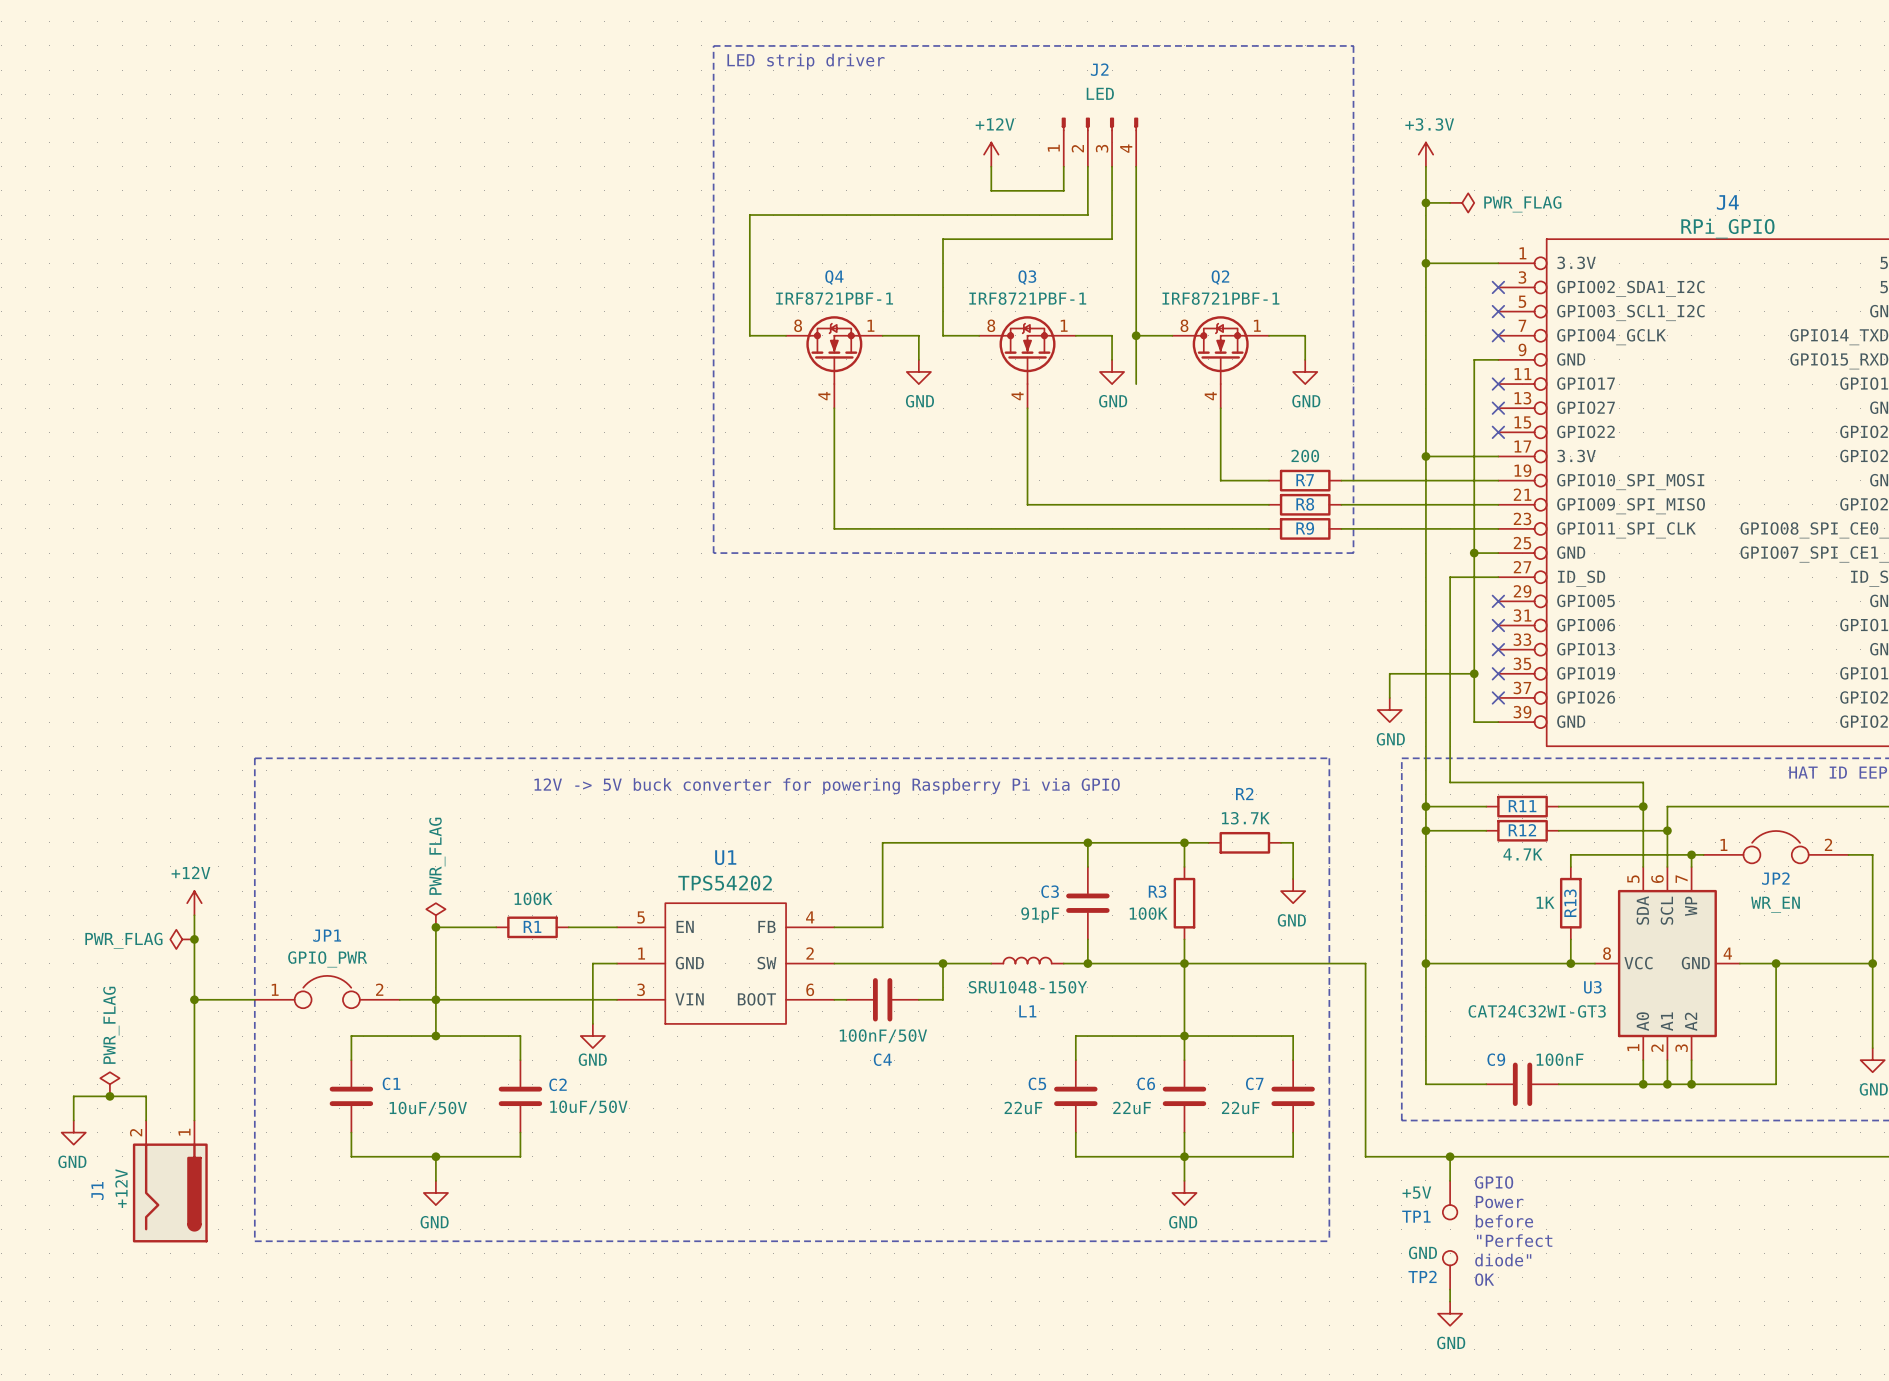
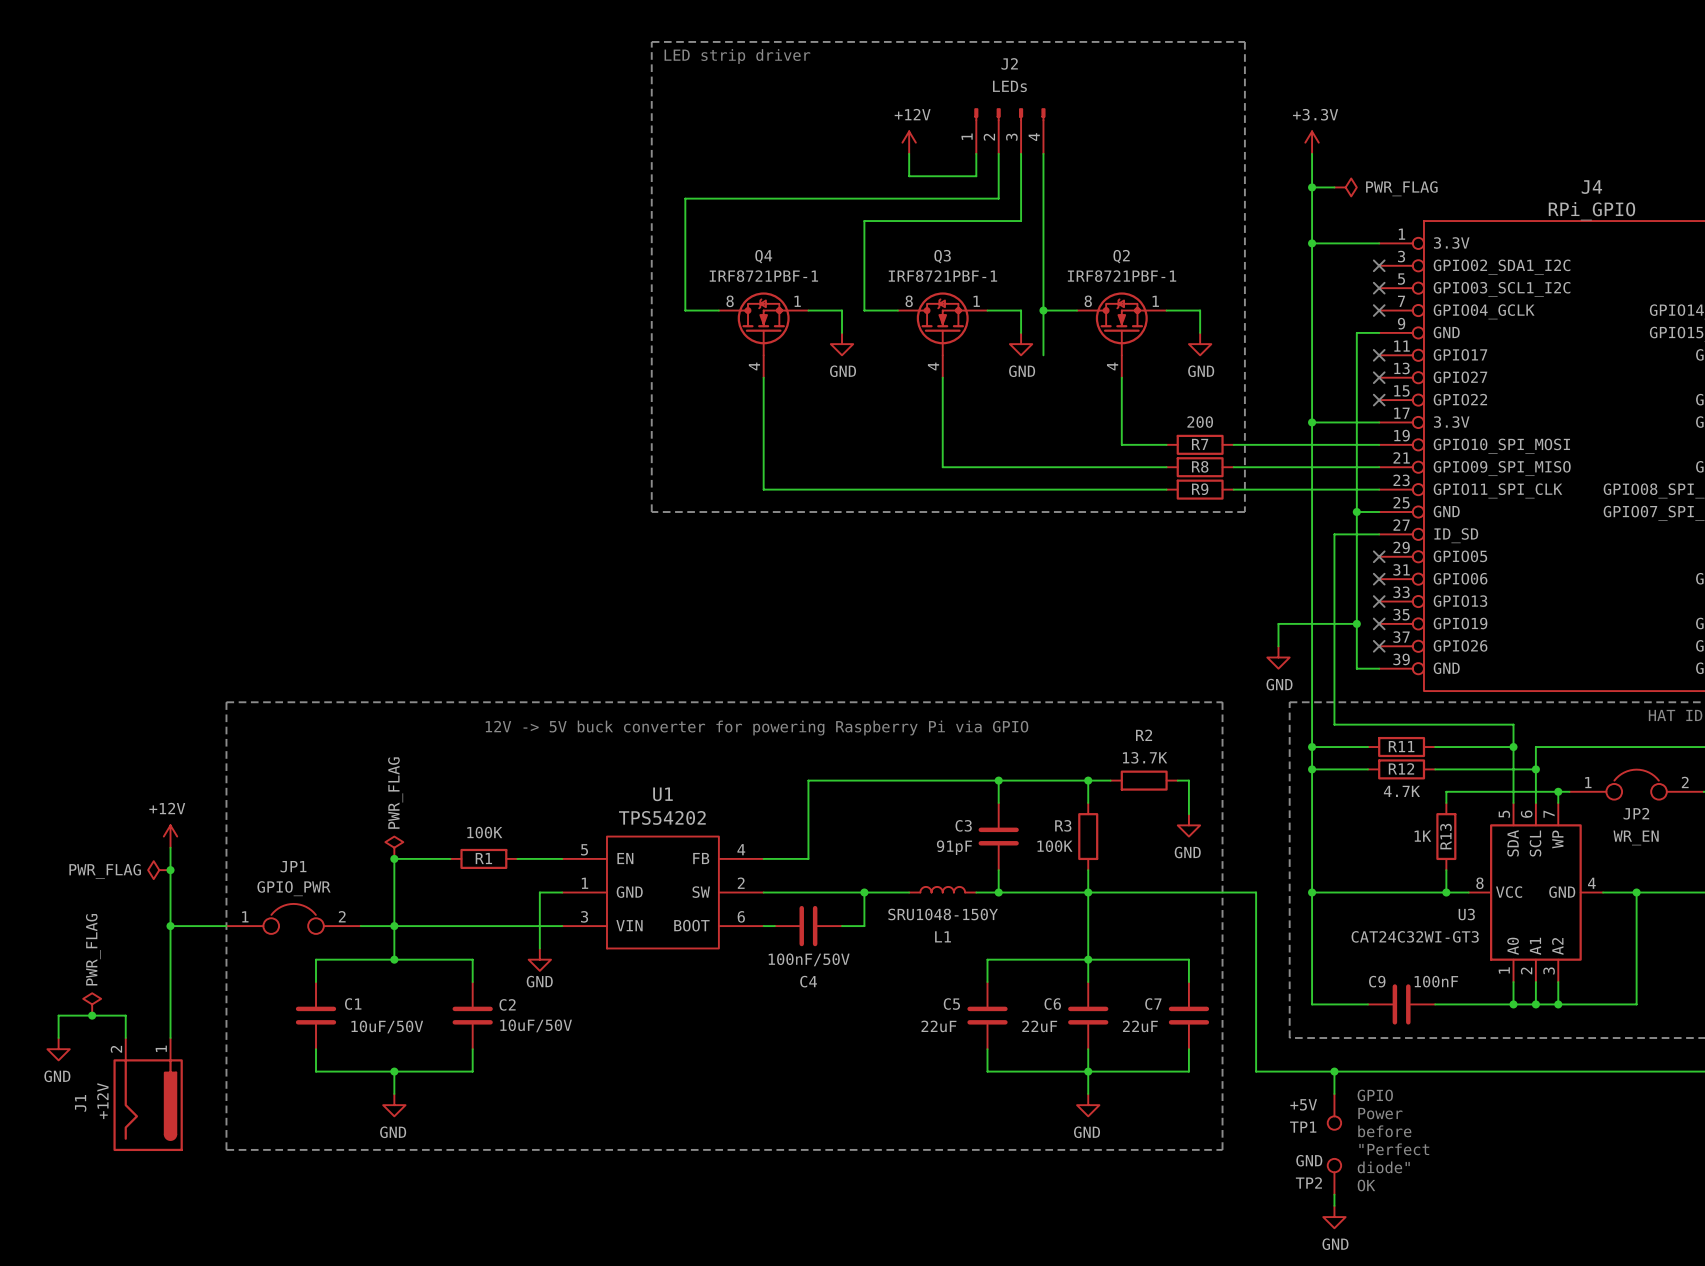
J2 value: LED (1100, 93) -> LEDs (1009, 86)

